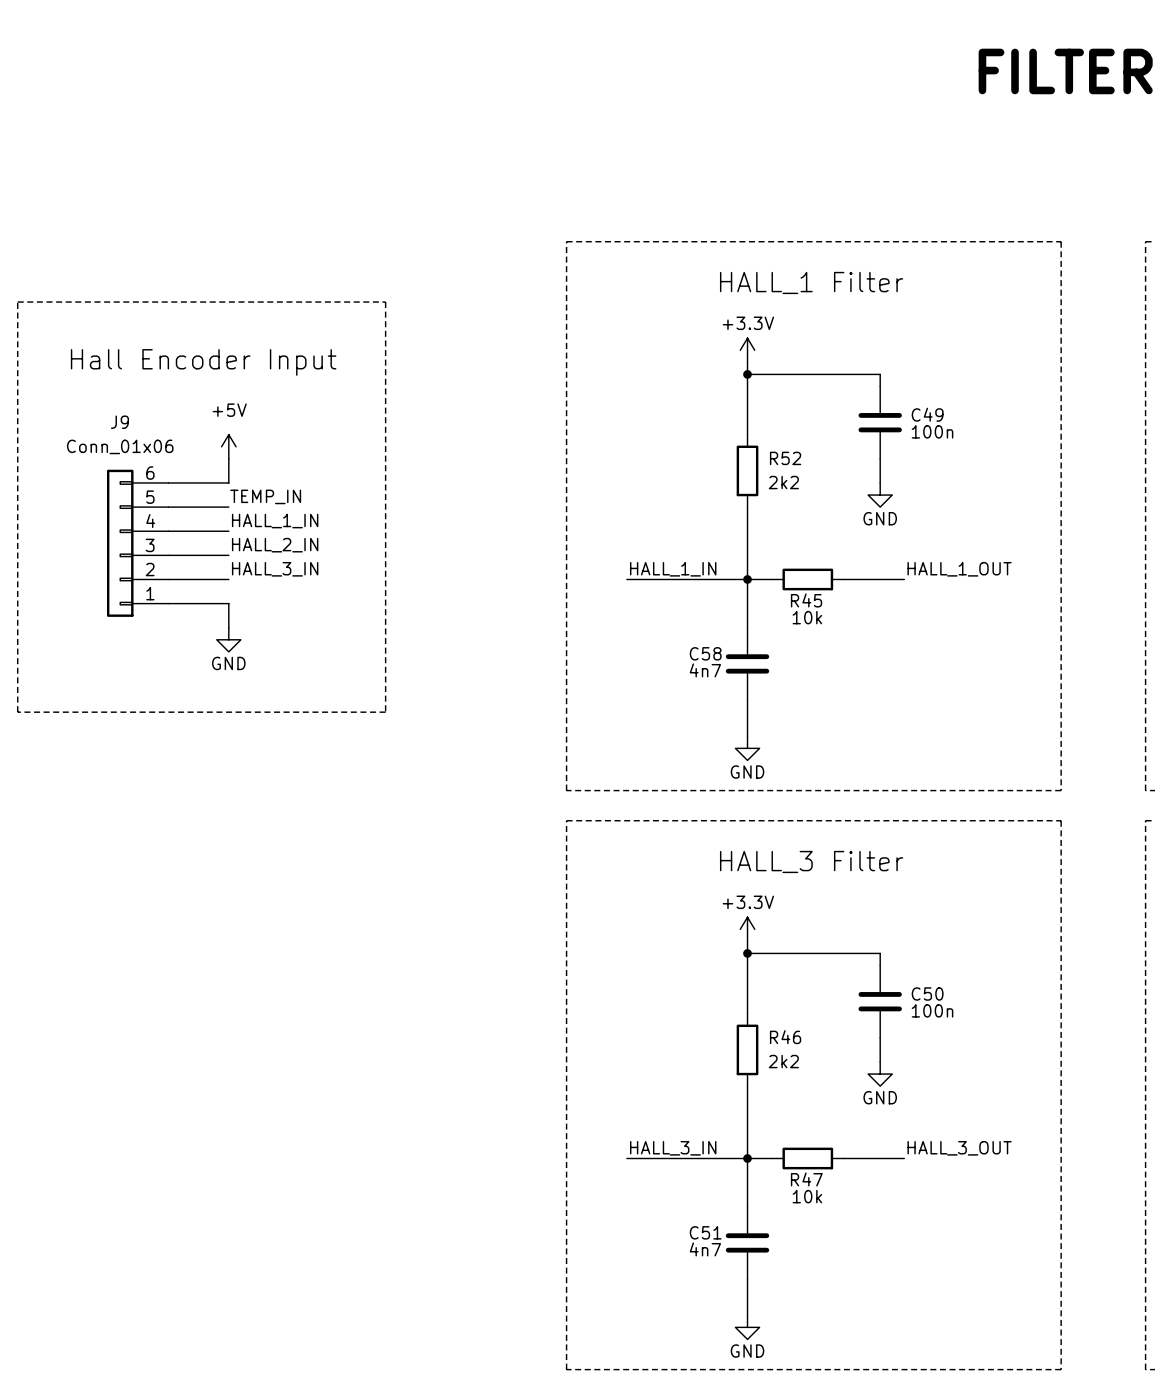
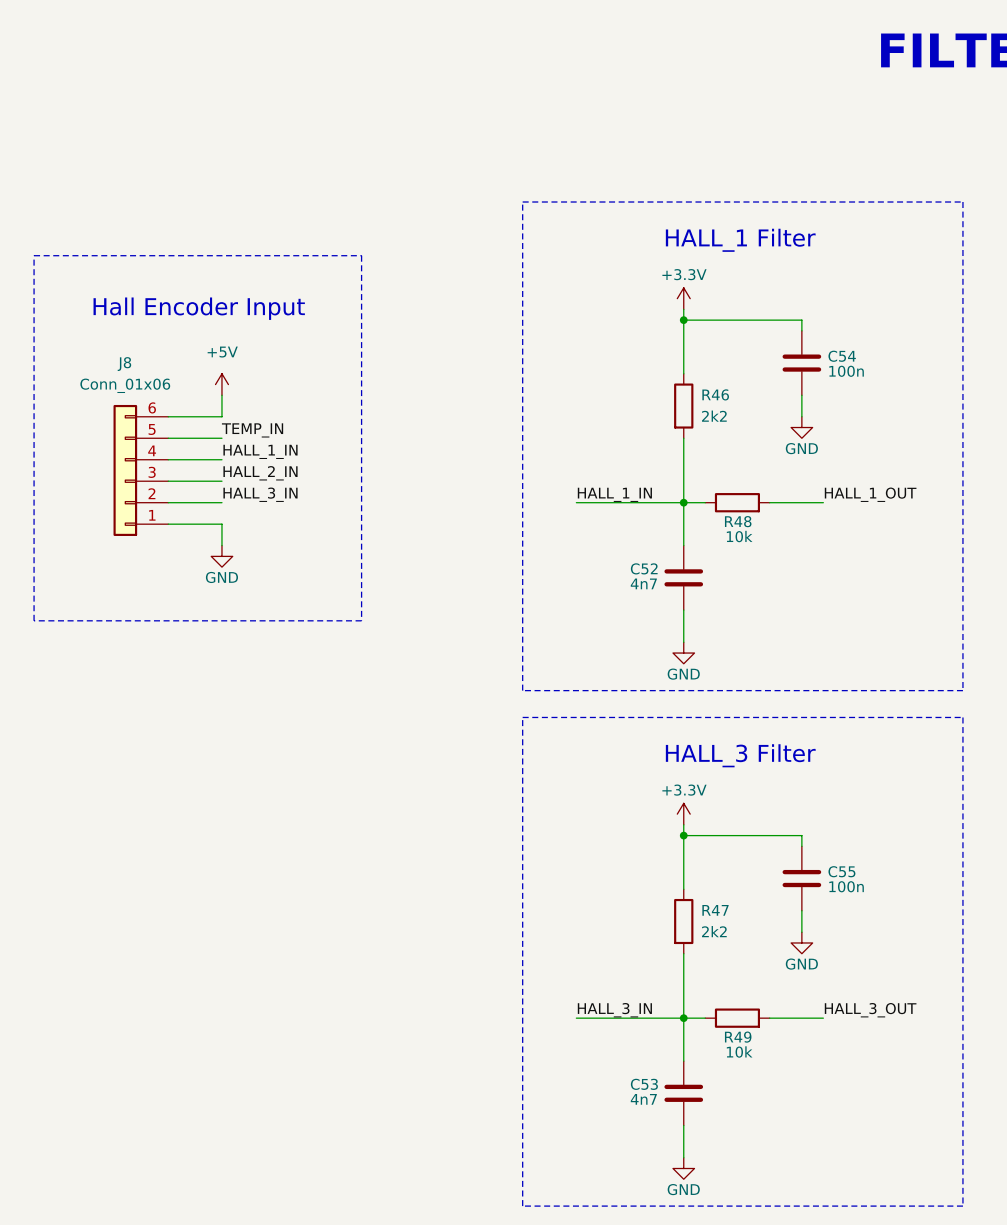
C49 name: C49 (927, 414) -> C54 (842, 356)
J9 name: J9 (119, 422) -> J8 (124, 364)
R52 name: R52 (785, 458) -> R46 (715, 394)
R45 name: R45 (806, 600) -> R48 (738, 521)
C58 name: C58 (705, 653) -> C52 (644, 568)
C50 name: C50 (927, 993) -> C55 (841, 871)
R46 name: R46 (785, 1037) -> R47 (715, 910)
R47 name: R47 (806, 1179) -> R49 (738, 1037)
C51 name: C51 (705, 1232) -> C53 (644, 1084)

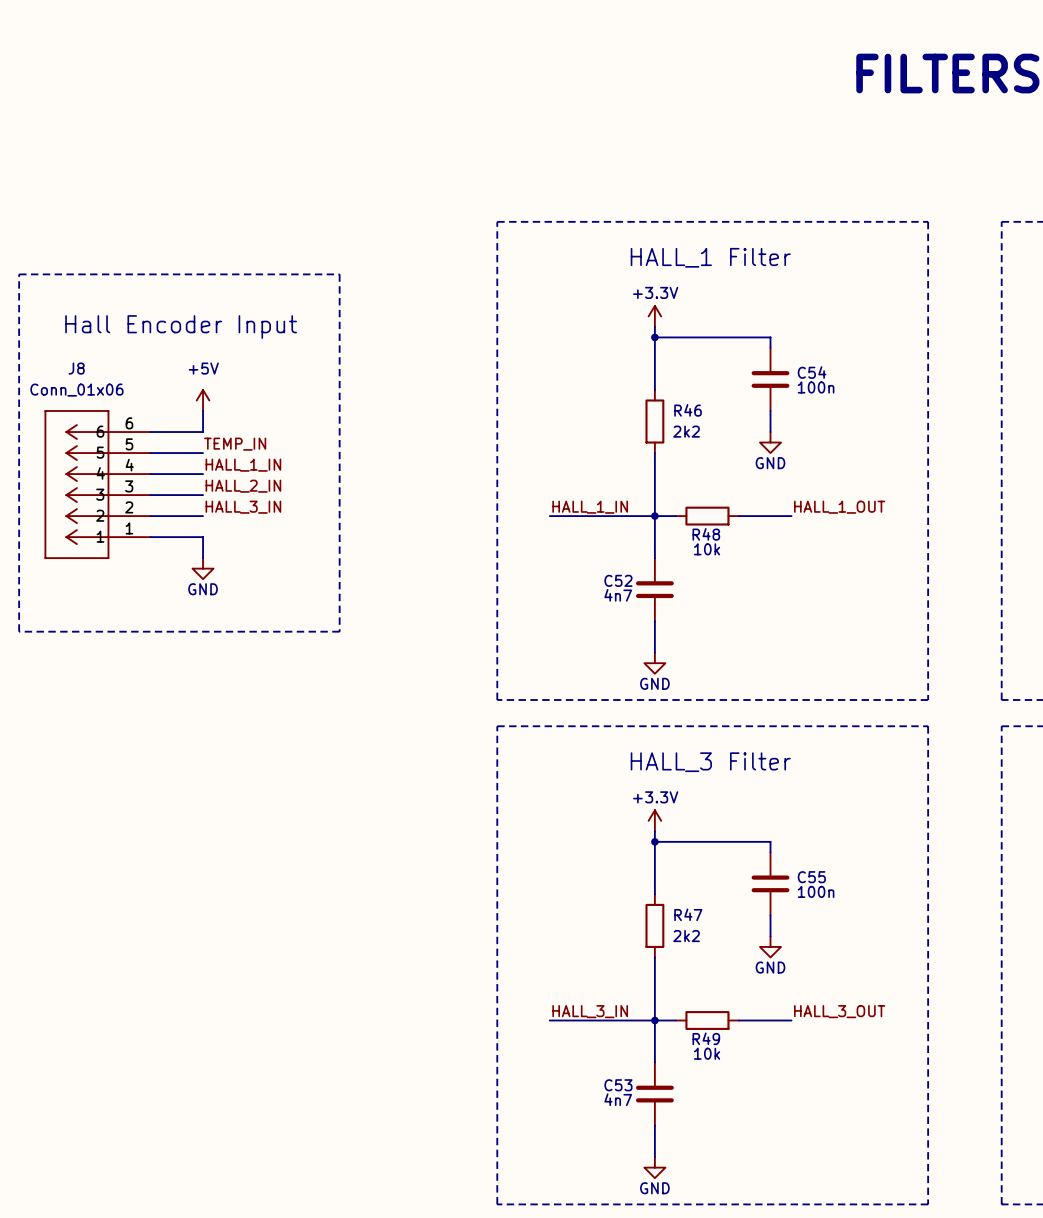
J8 symbol: [113, 404, 169, 536] -> [44, 410, 151, 559]

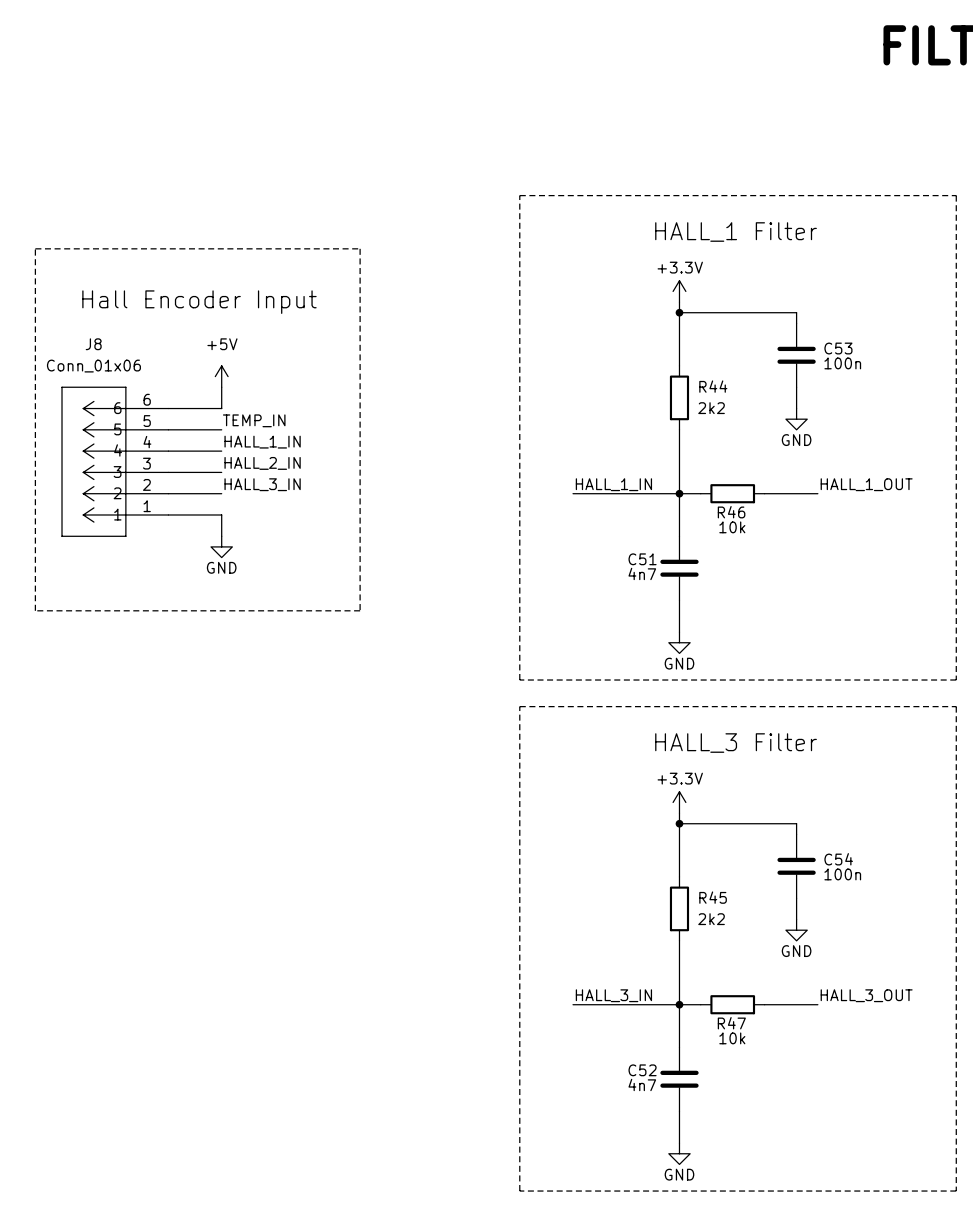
C54 name: C54 (812, 372) -> C53 (838, 348)
R46 name: R46 (688, 410) -> R44 (713, 386)
R48 name: R48 (706, 534) -> R46 (731, 512)
C52 name: C52 (618, 580) -> C51 (642, 559)
C55 name: C55 (811, 877) -> C54 (838, 859)
R47 name: R47 (688, 914) -> R45 (713, 897)
R49 name: R49 (706, 1038) -> R47 (731, 1023)
C53 name: C53 (618, 1085) -> C52 (642, 1070)

